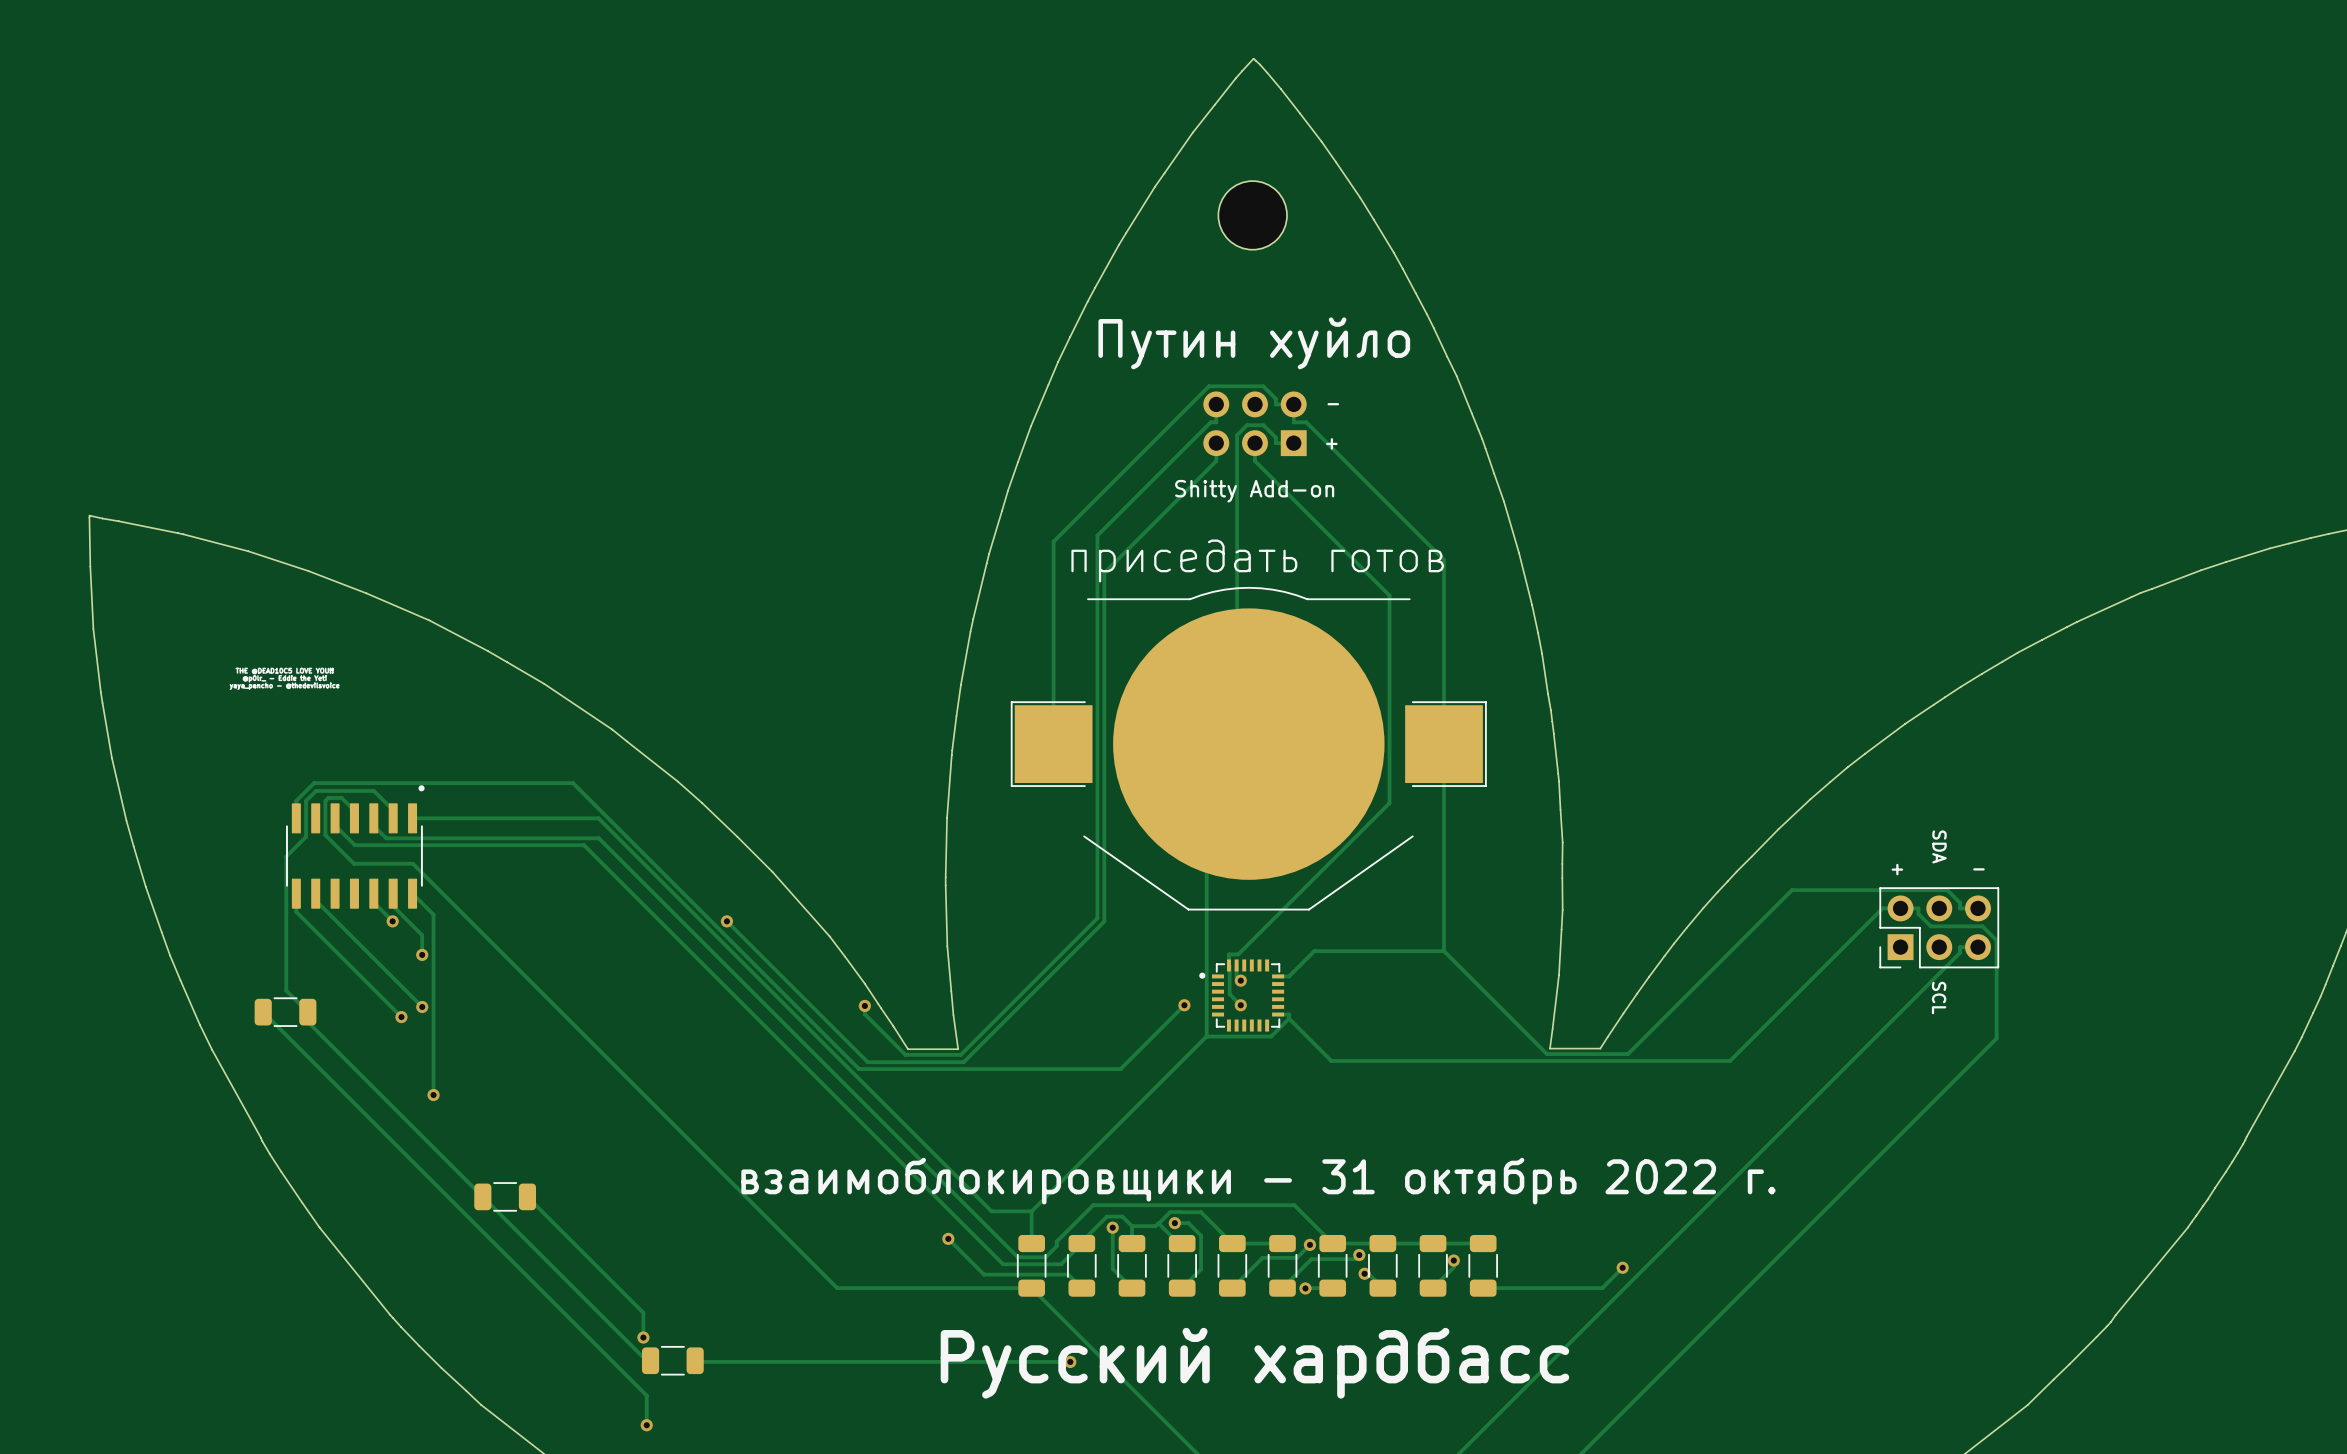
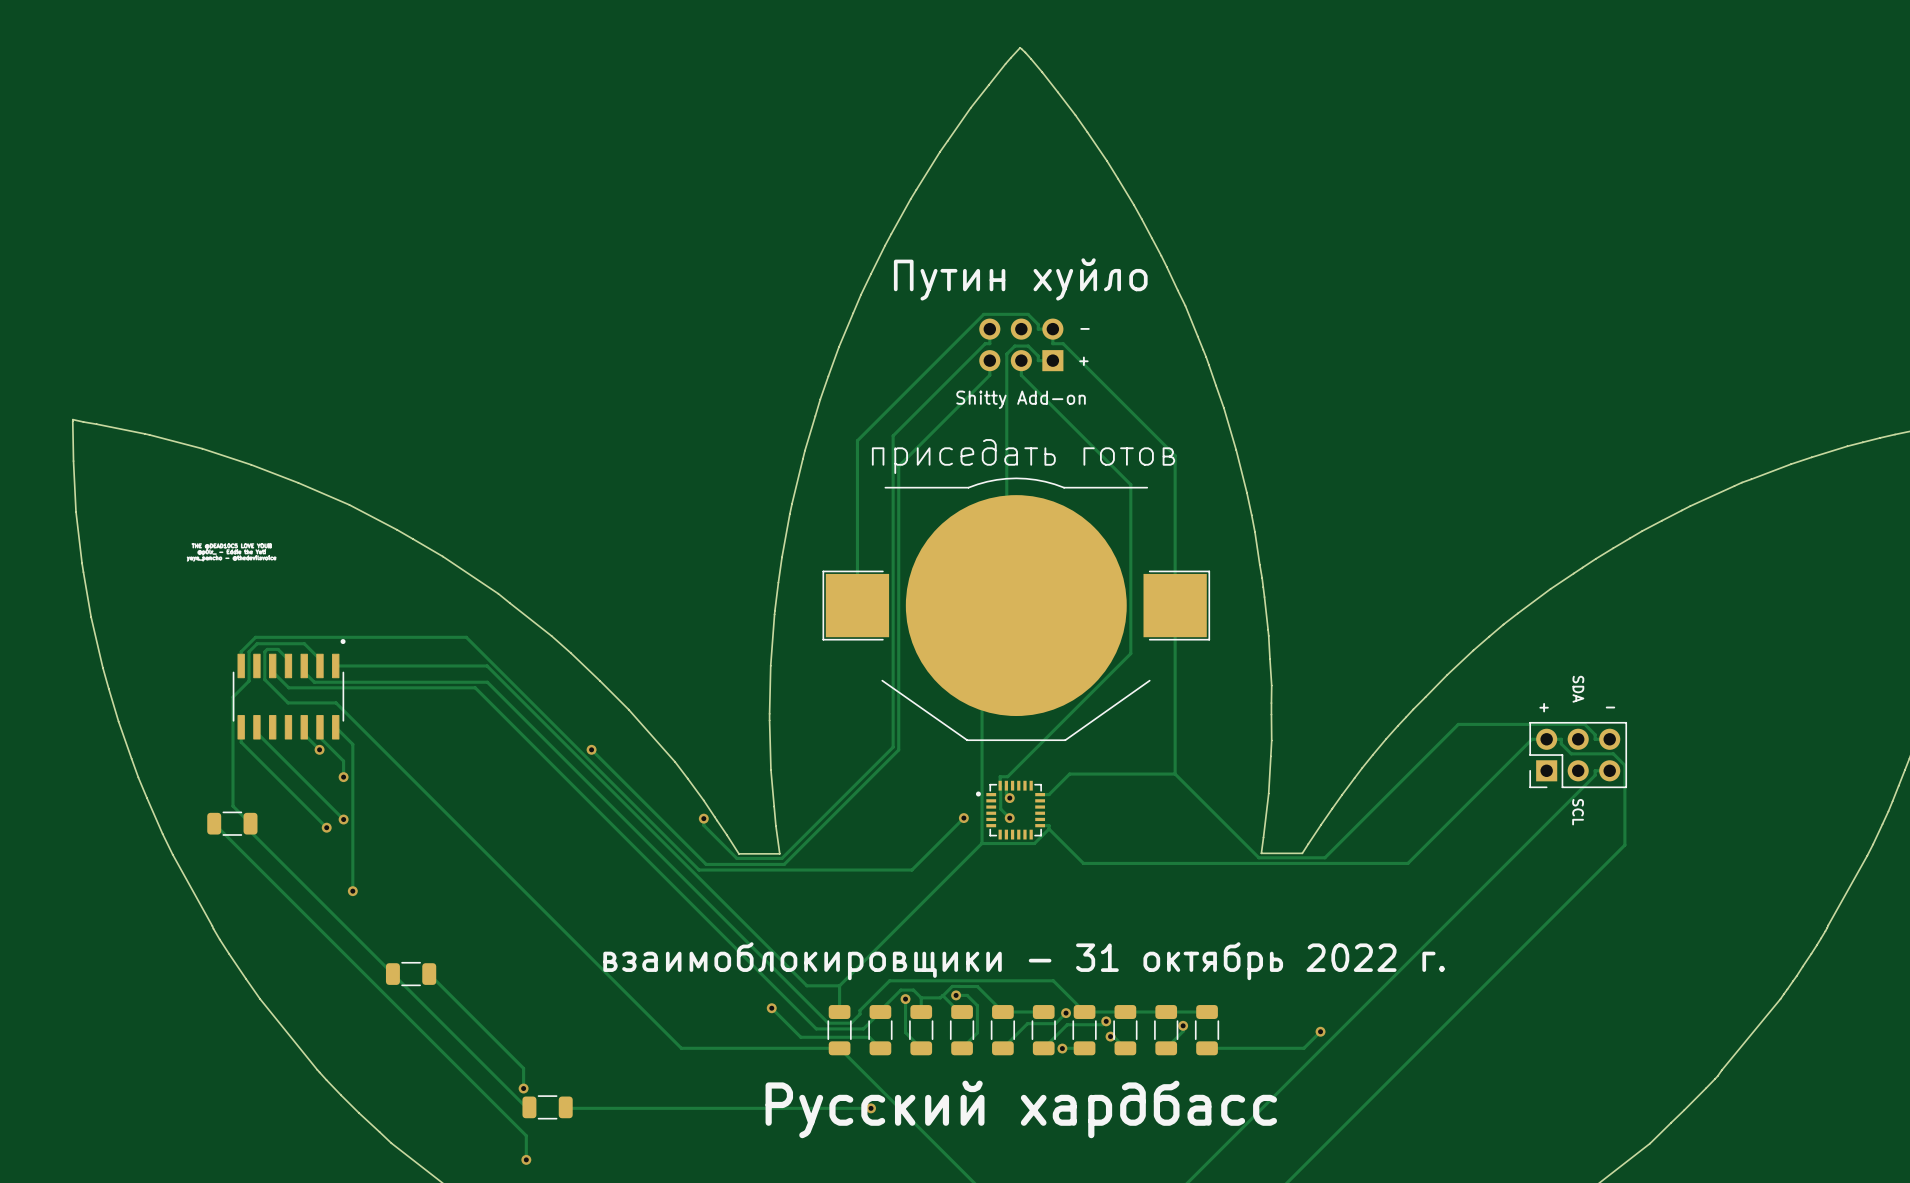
part: (1252, 215) -> none

